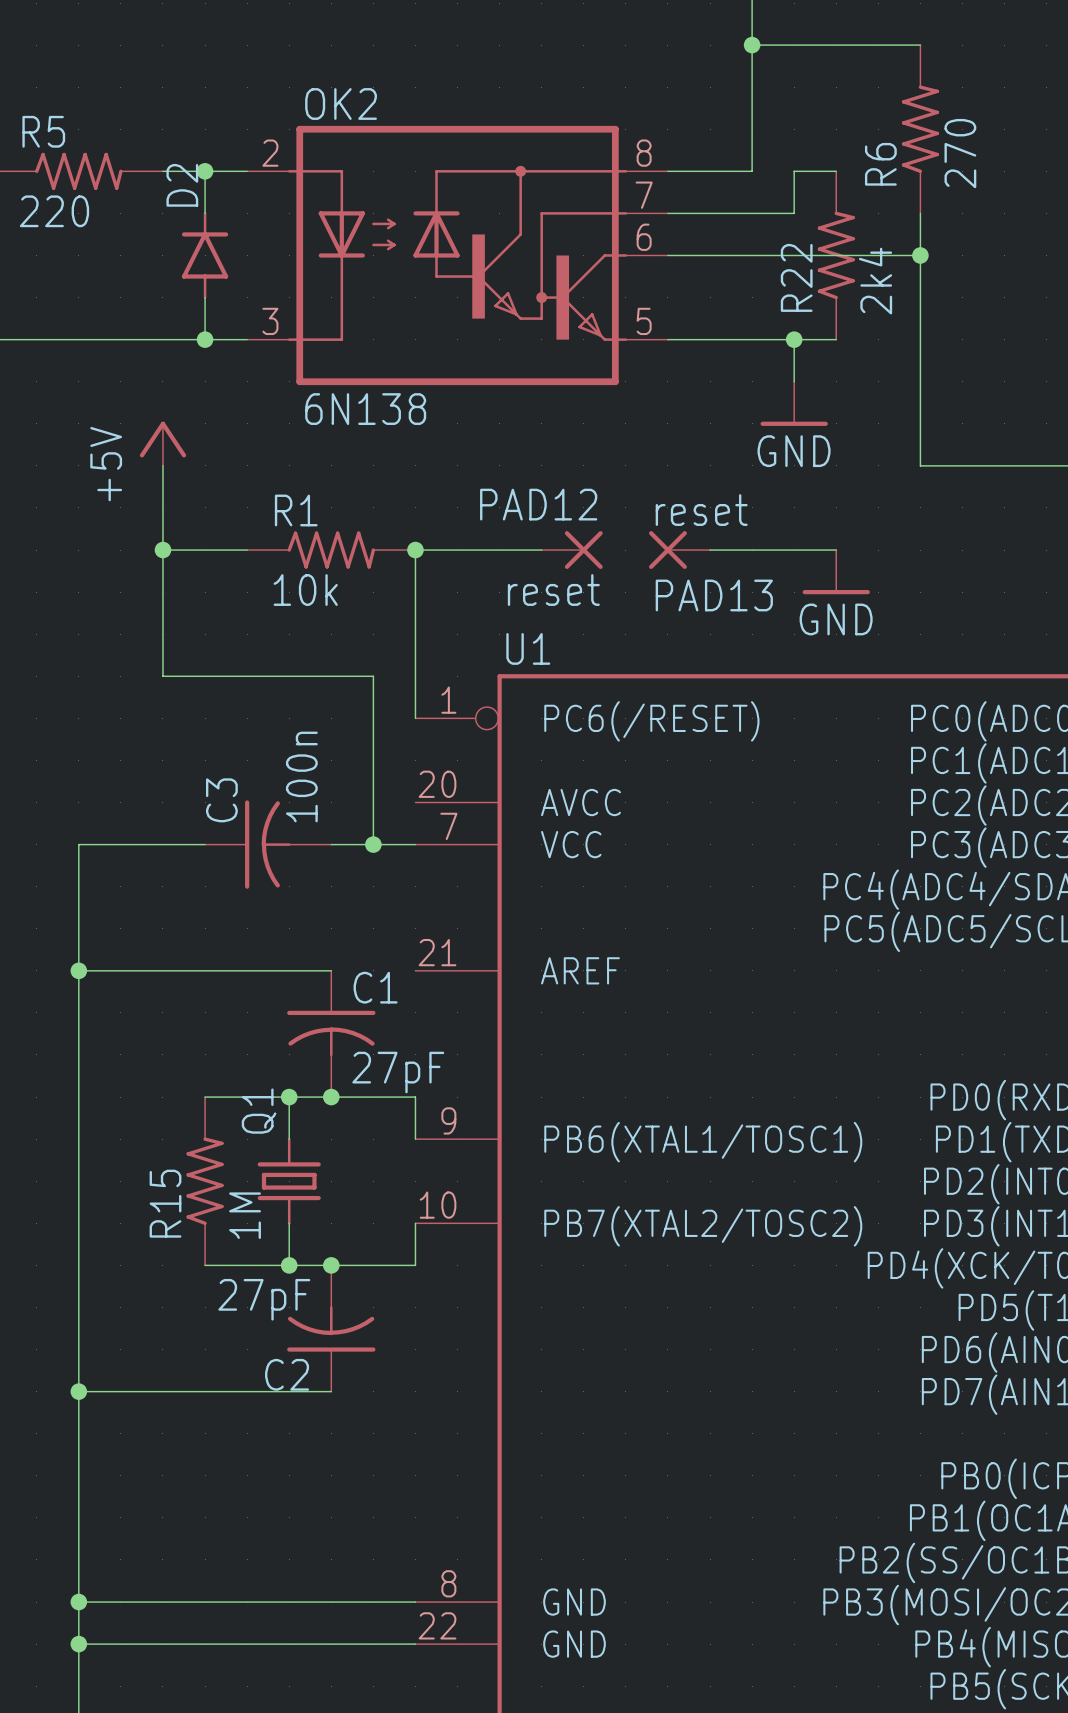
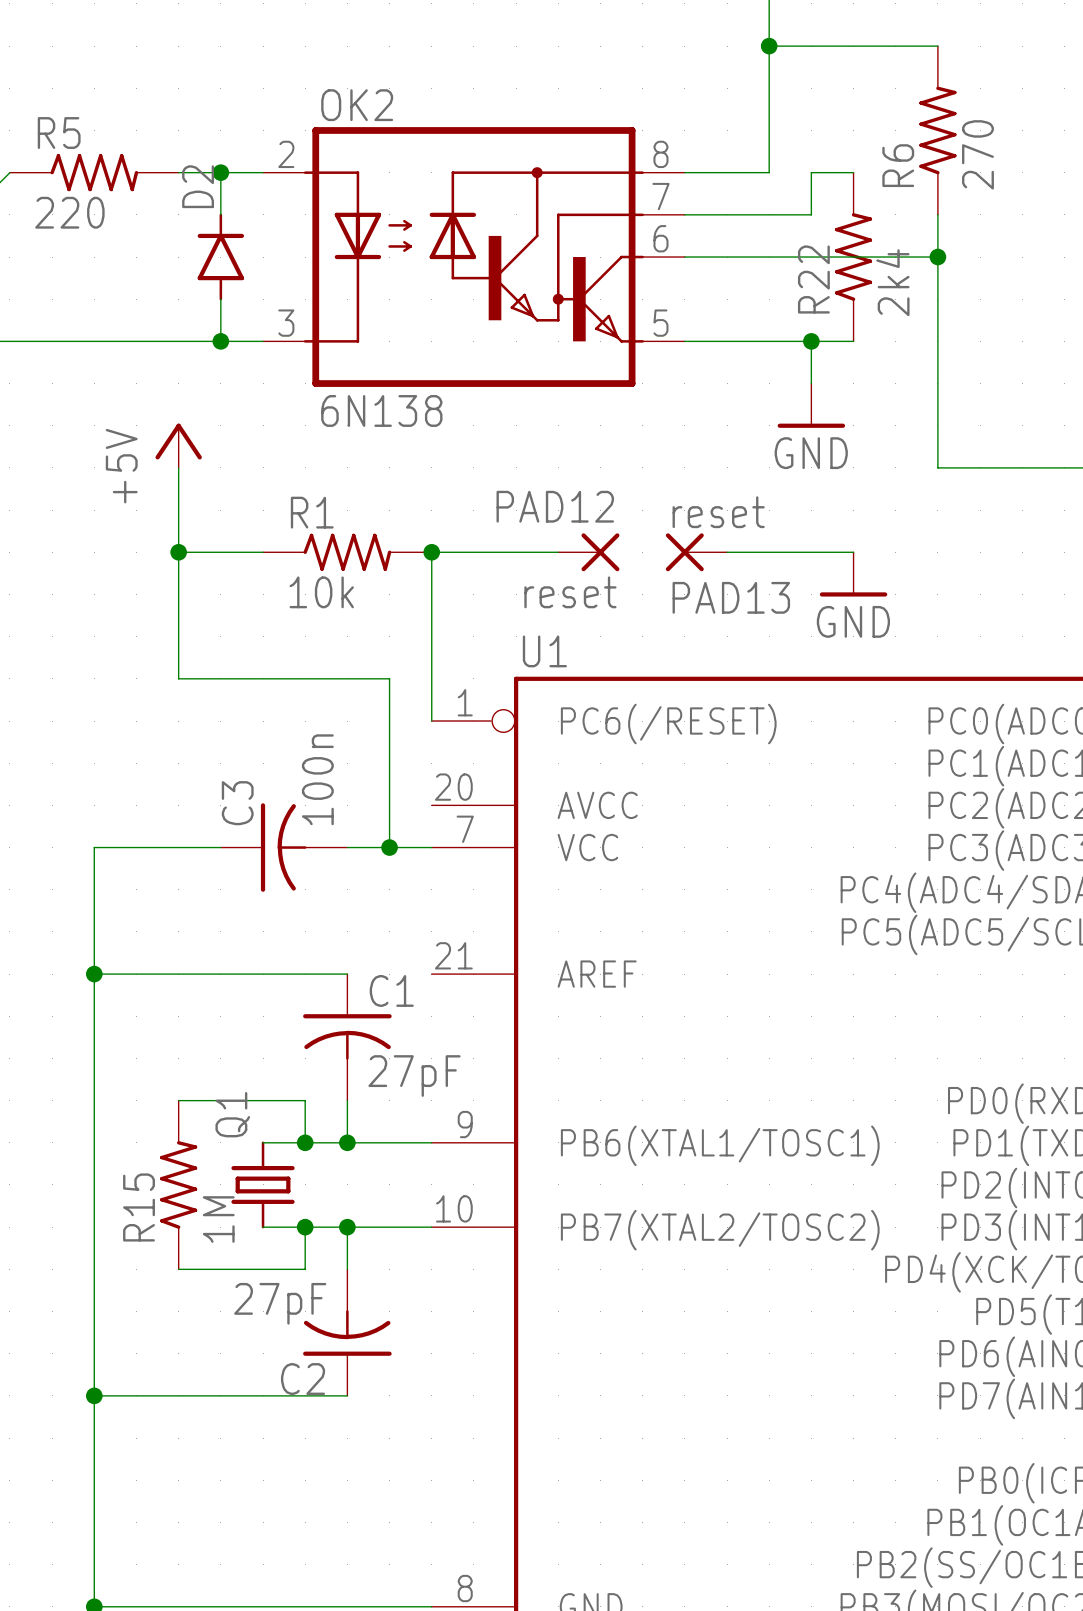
wire: none -> (178, 1100) (220, 1100)
wire: (289, 1097) (415, 1097) (415, 1139) -> (263, 1142) (431, 1142)
junction: (289, 1097) -> none
wire: none -> (347, 1100) (347, 1142)
junction: (331, 1097) -> none
junction: none -> (305, 1142)
junction: none -> (347, 1142)
R15 position: (205, 1181) -> (178, 1184)
Q1 position: (289, 1181) -> (263, 1184)
junction: none -> (305, 1227)
wire: none -> (347, 1227) (347, 1269)
junction: none -> (347, 1227)
wire: (415, 1223) (415, 1265) (289, 1265) -> (431, 1227) (263, 1227)
wire: none -> (178, 1269) (220, 1269)
junction: (289, 1265) -> none
junction: (331, 1265) -> none

